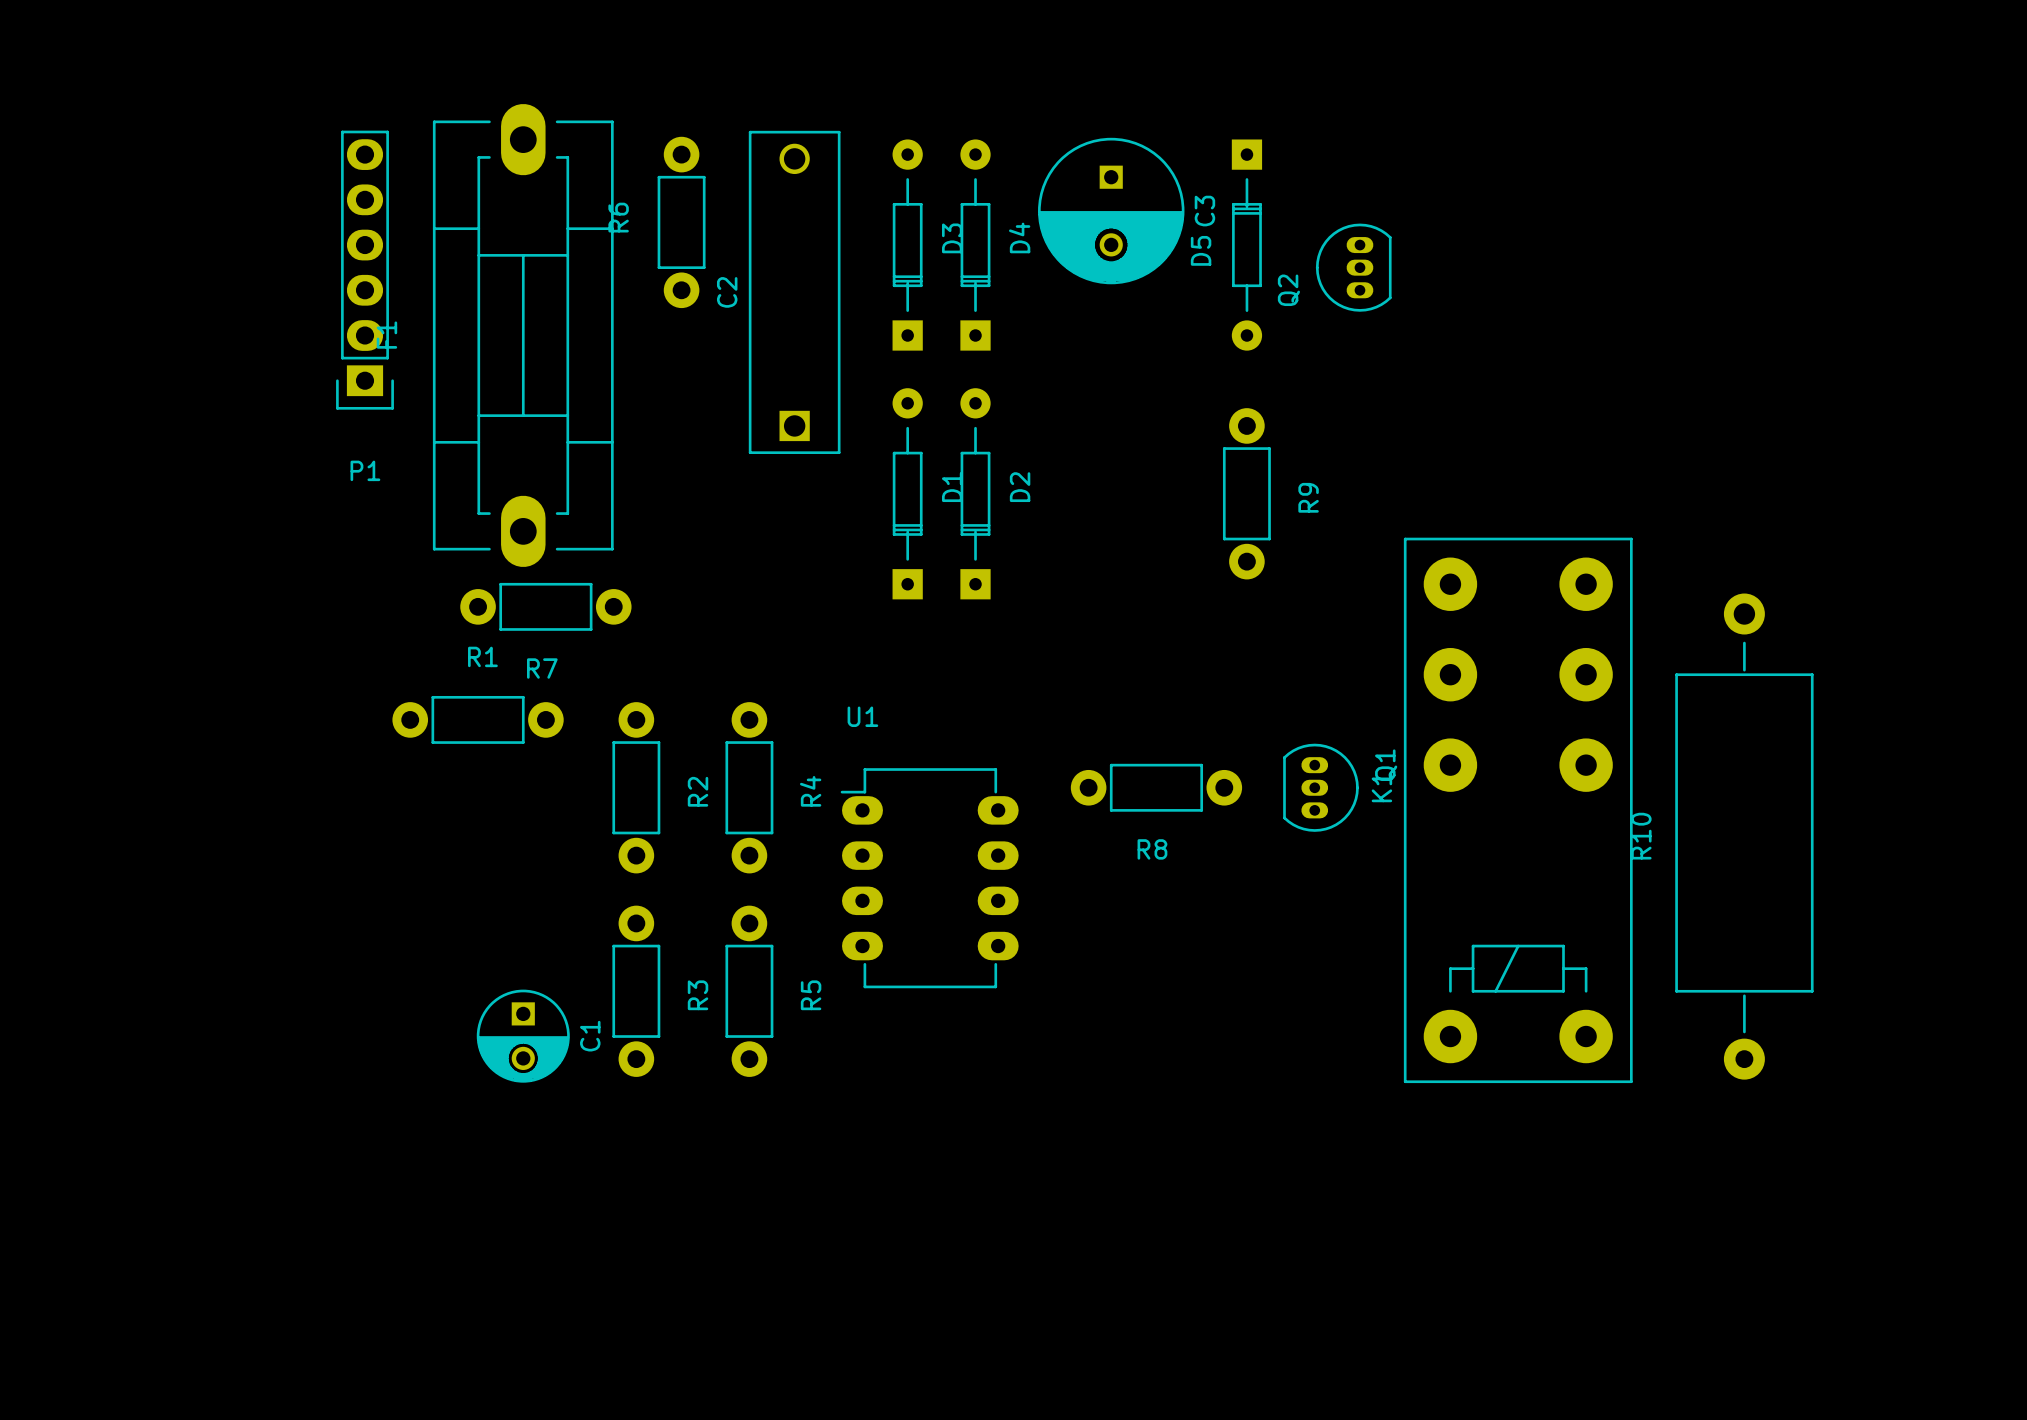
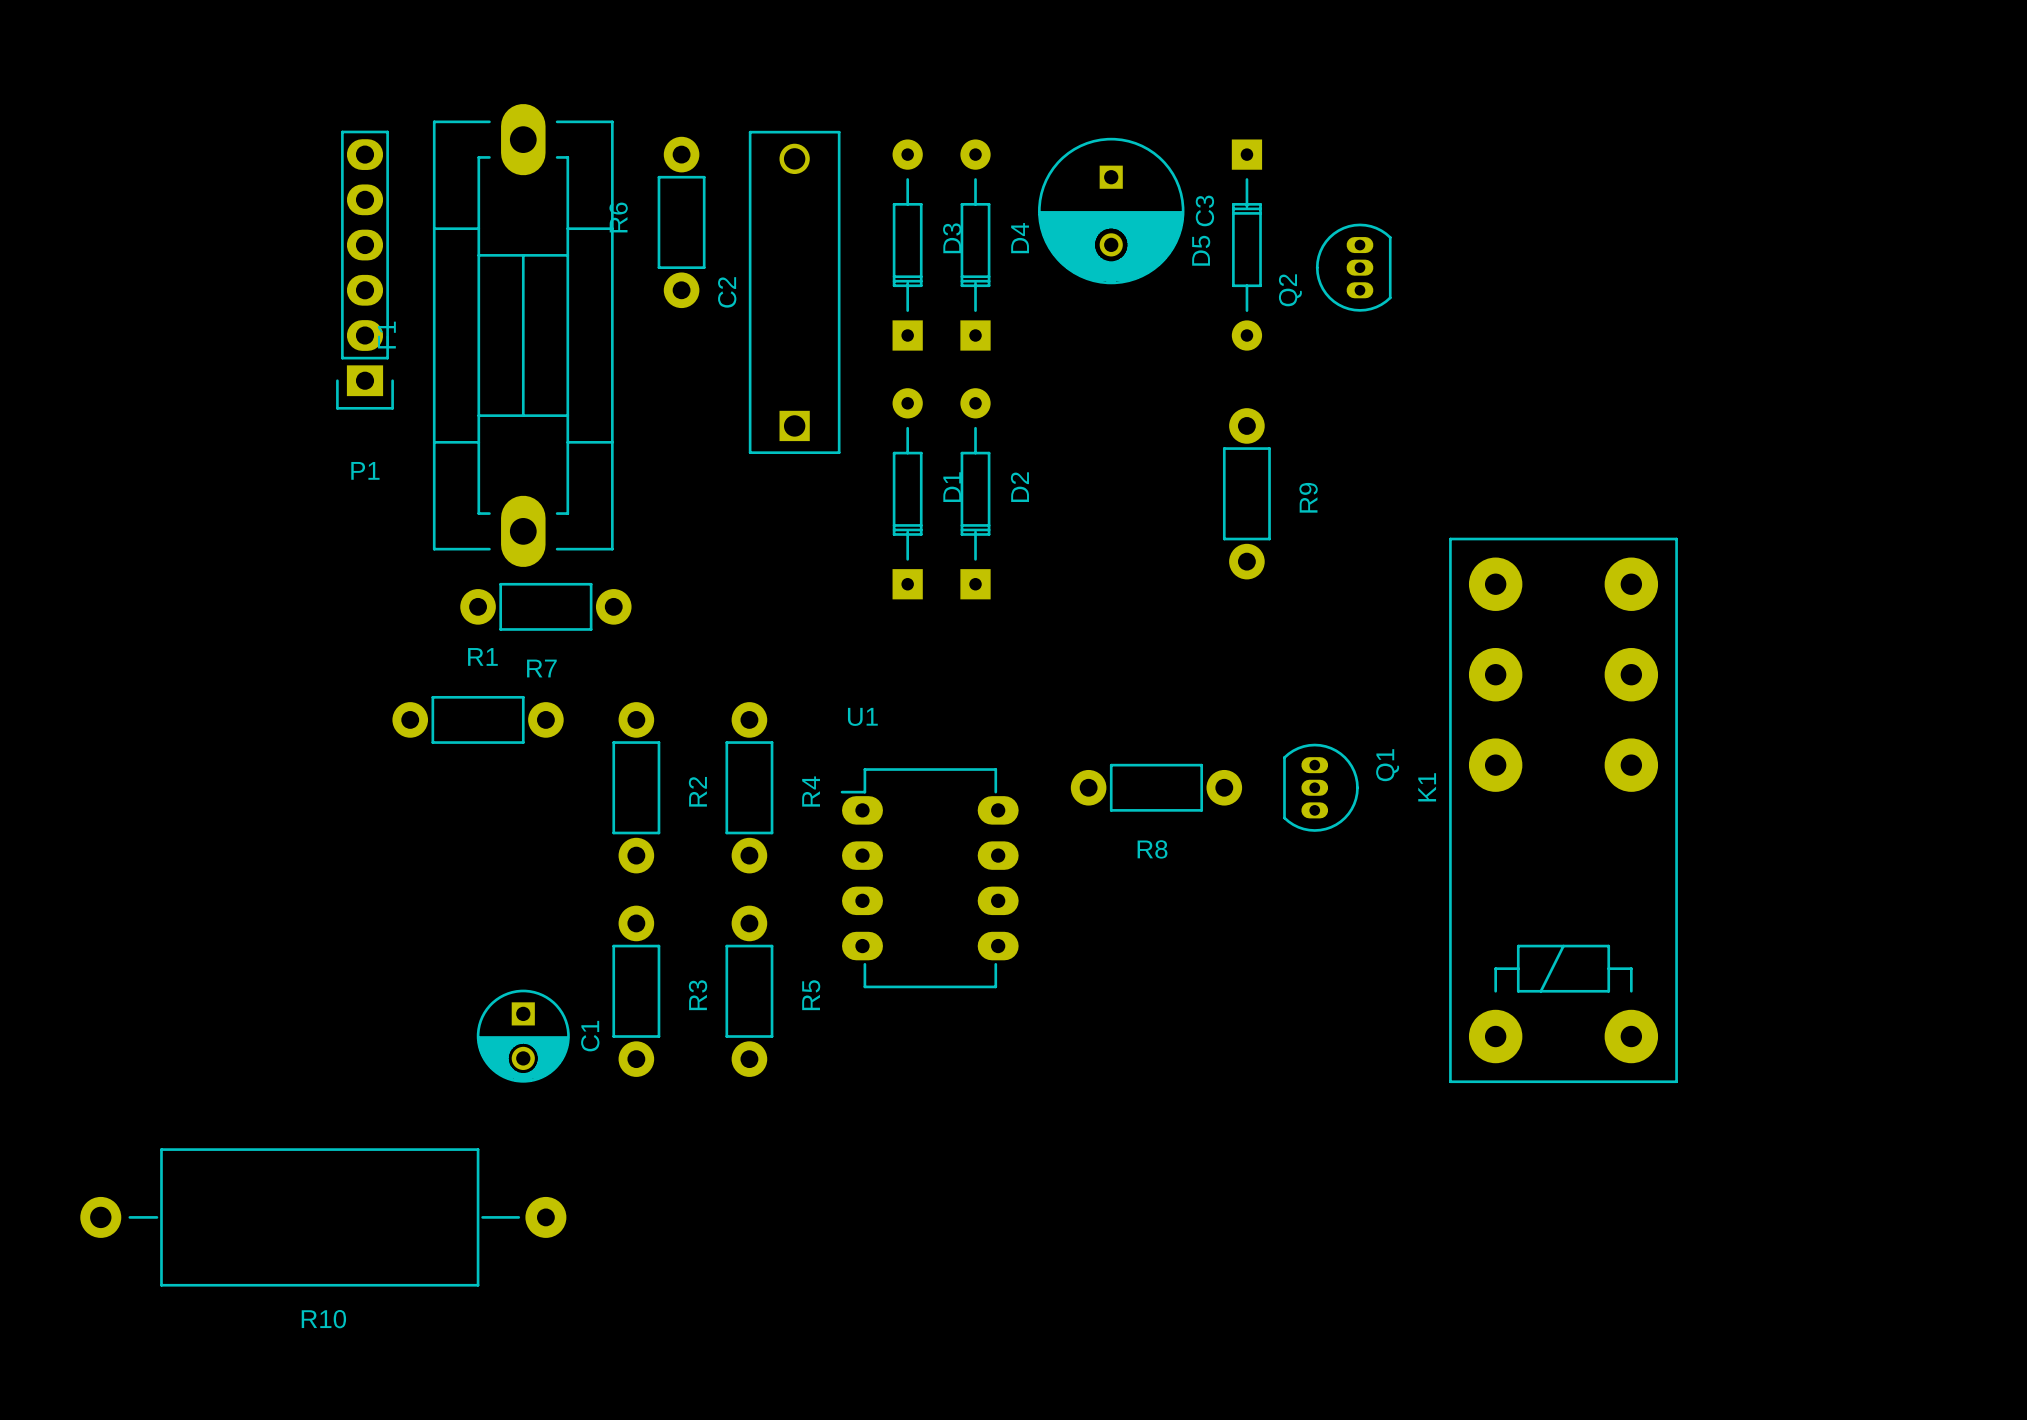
K1 position: (1518, 810) -> (1563, 810)
R10 rotation: 0° (1744, 836) -> 90° counterclockwise (323, 1217)
R10 position: (1744, 836) -> (323, 1217)

